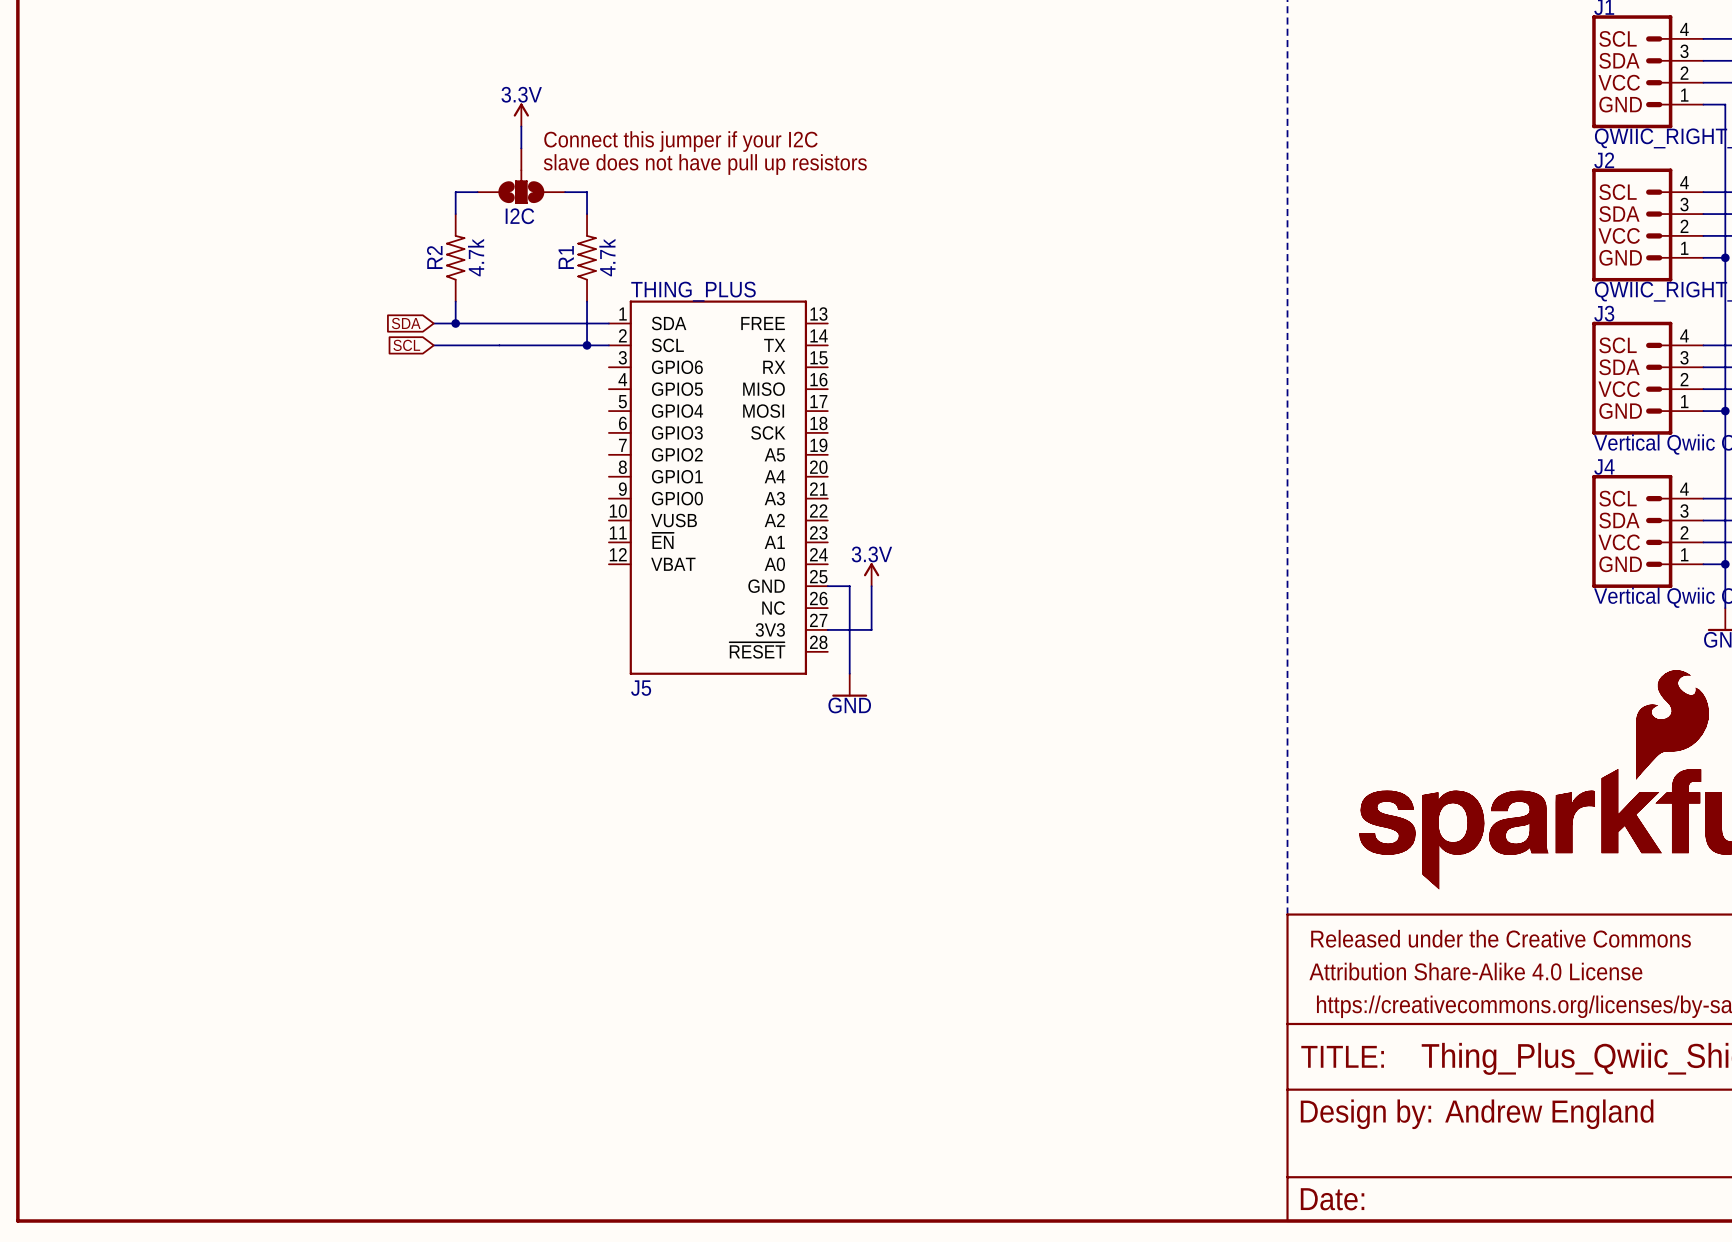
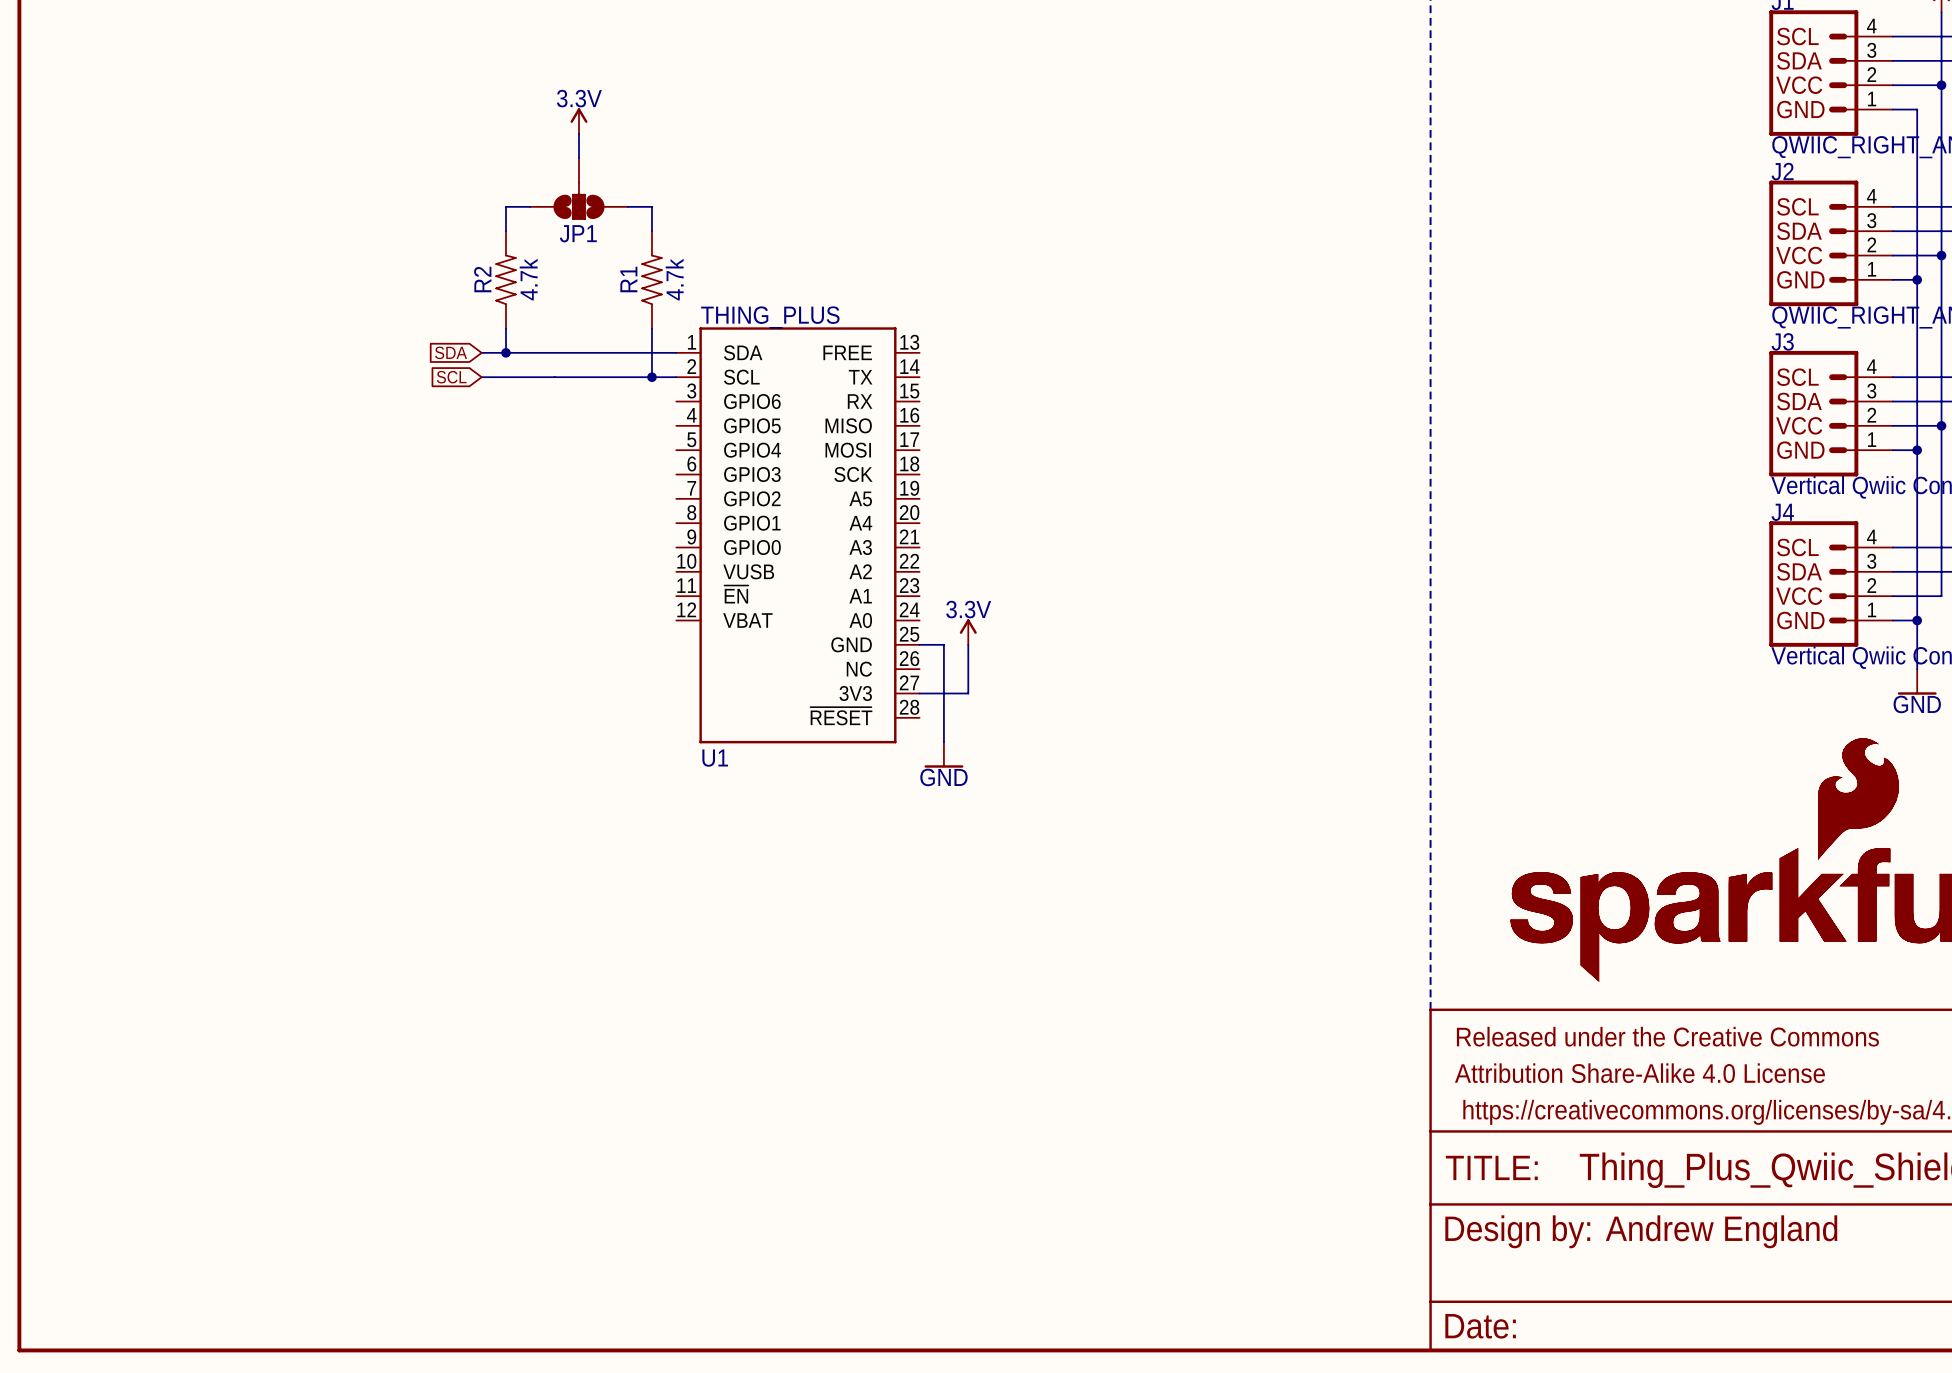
text: Connect this jumper if your I2C (680, 141) -> none
text: slave does not have pull up resistors (705, 164) -> none
I2C name: I2C (519, 216) -> JP1 (578, 233)
J5 name: J5 (641, 688) -> U1 (715, 758)

